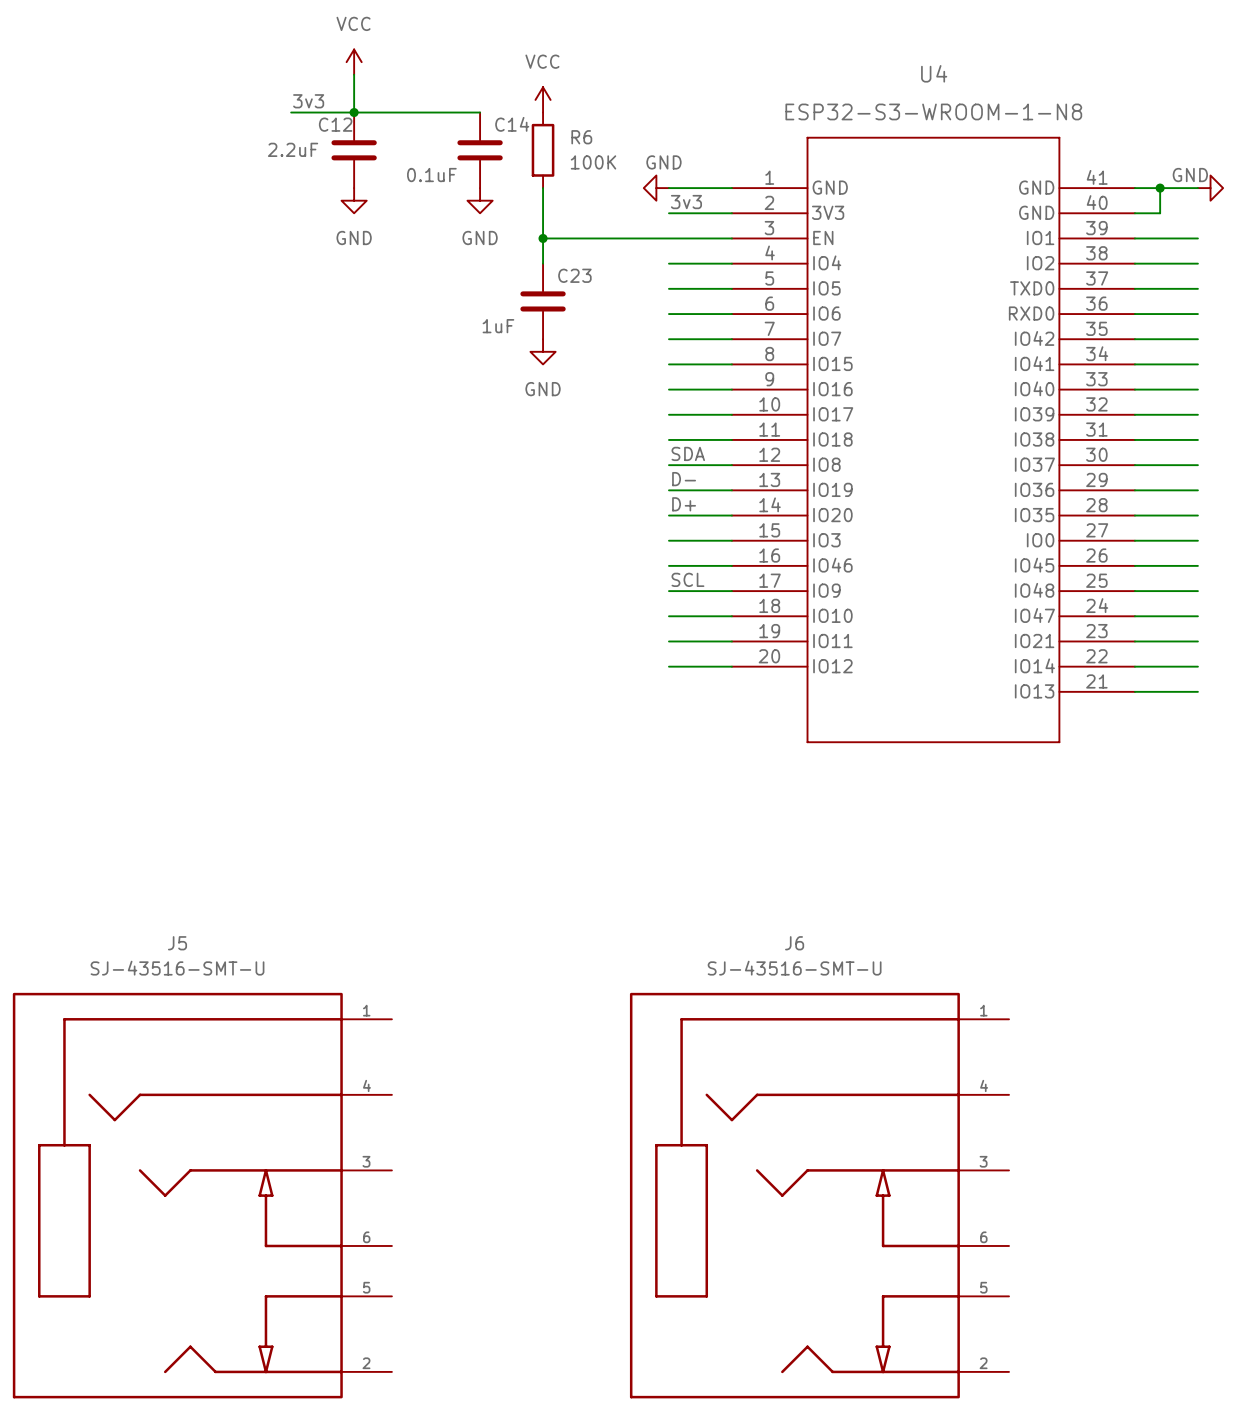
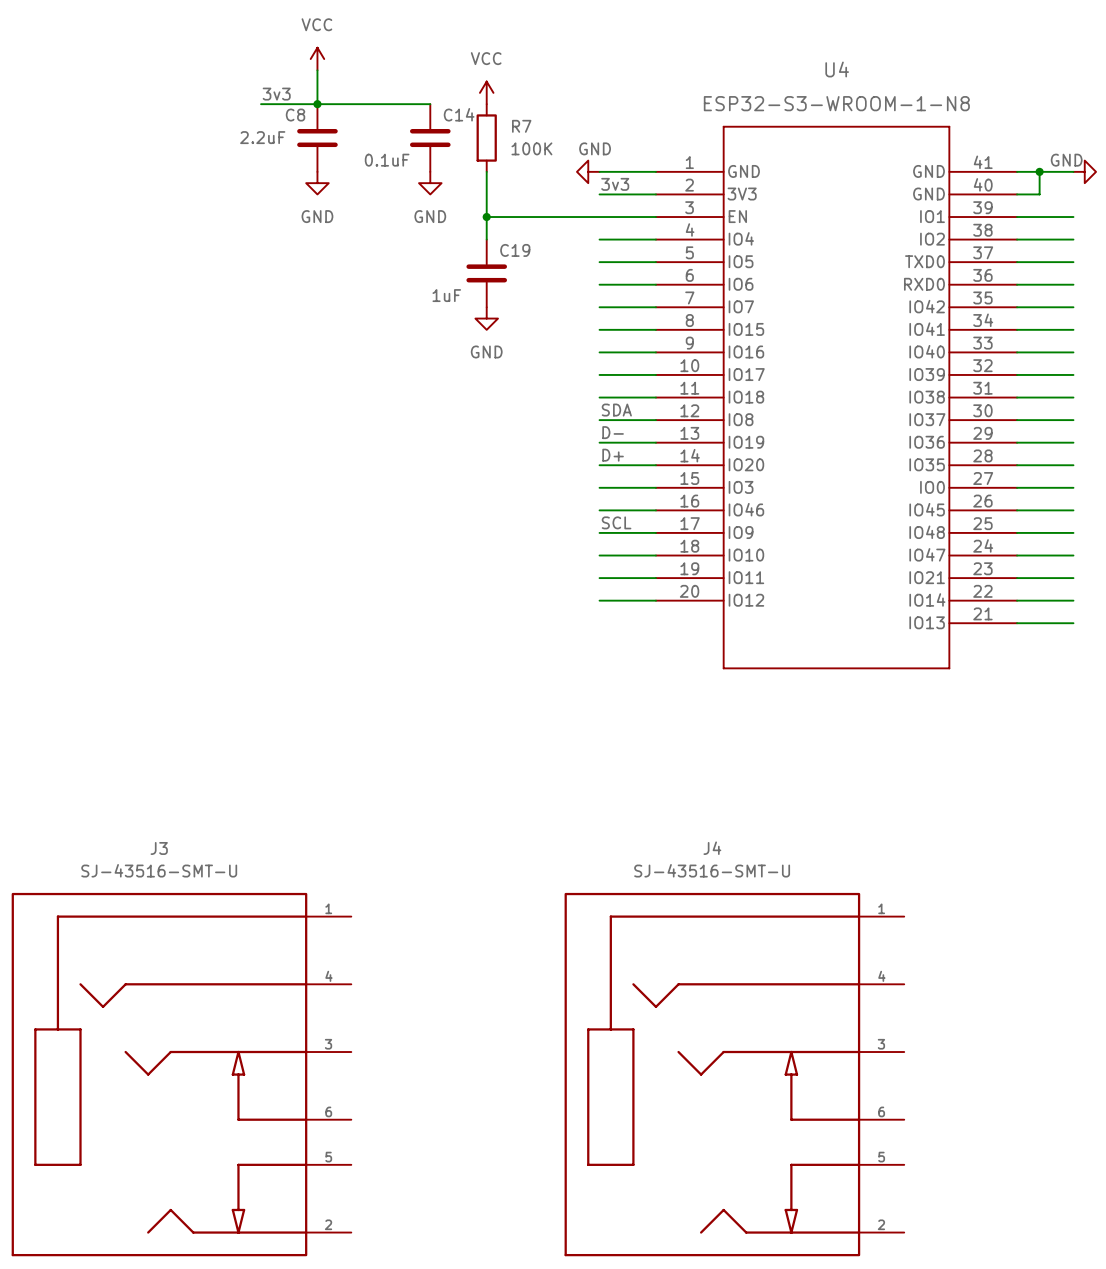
C12 name: C12 (335, 124) -> C8 (295, 115)
R6 name: R6 (581, 137) -> R7 (521, 126)
C23 name: C23 (574, 275) -> C19 (515, 250)
J5 name: J5 (177, 943) -> J3 (159, 848)
J6 name: J6 (794, 943) -> J4 (712, 848)

